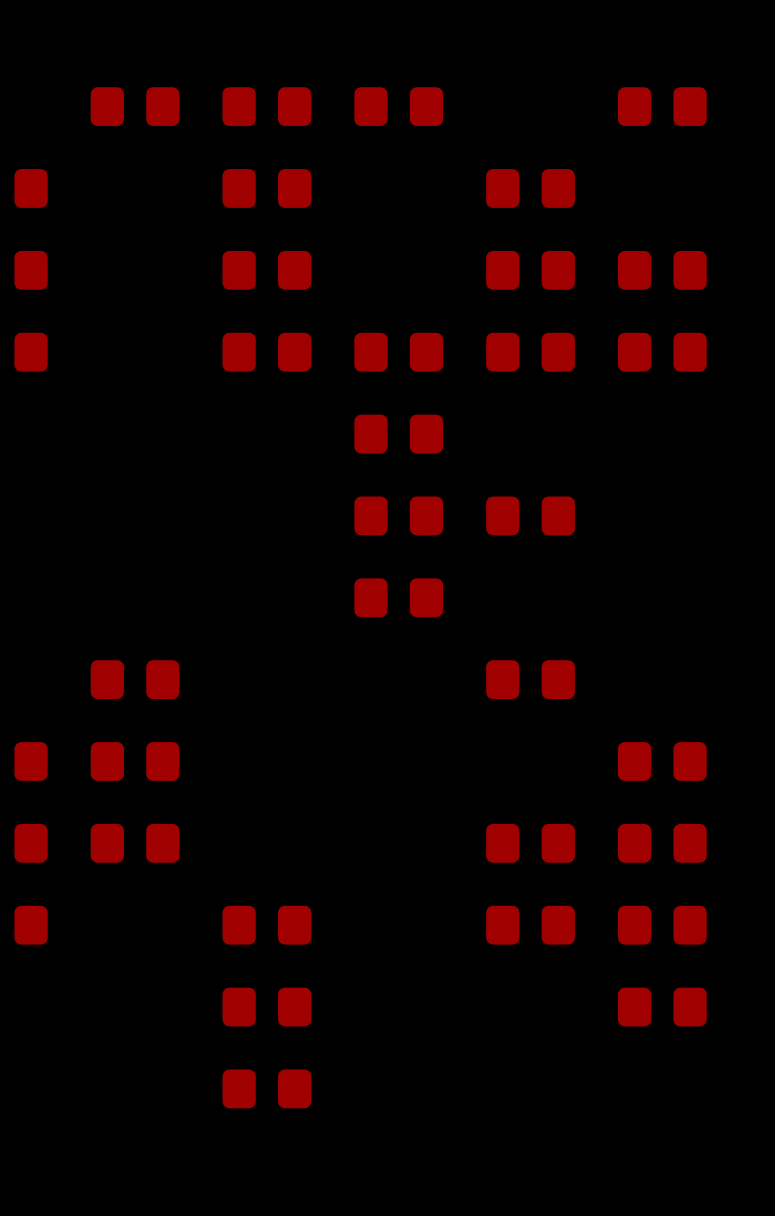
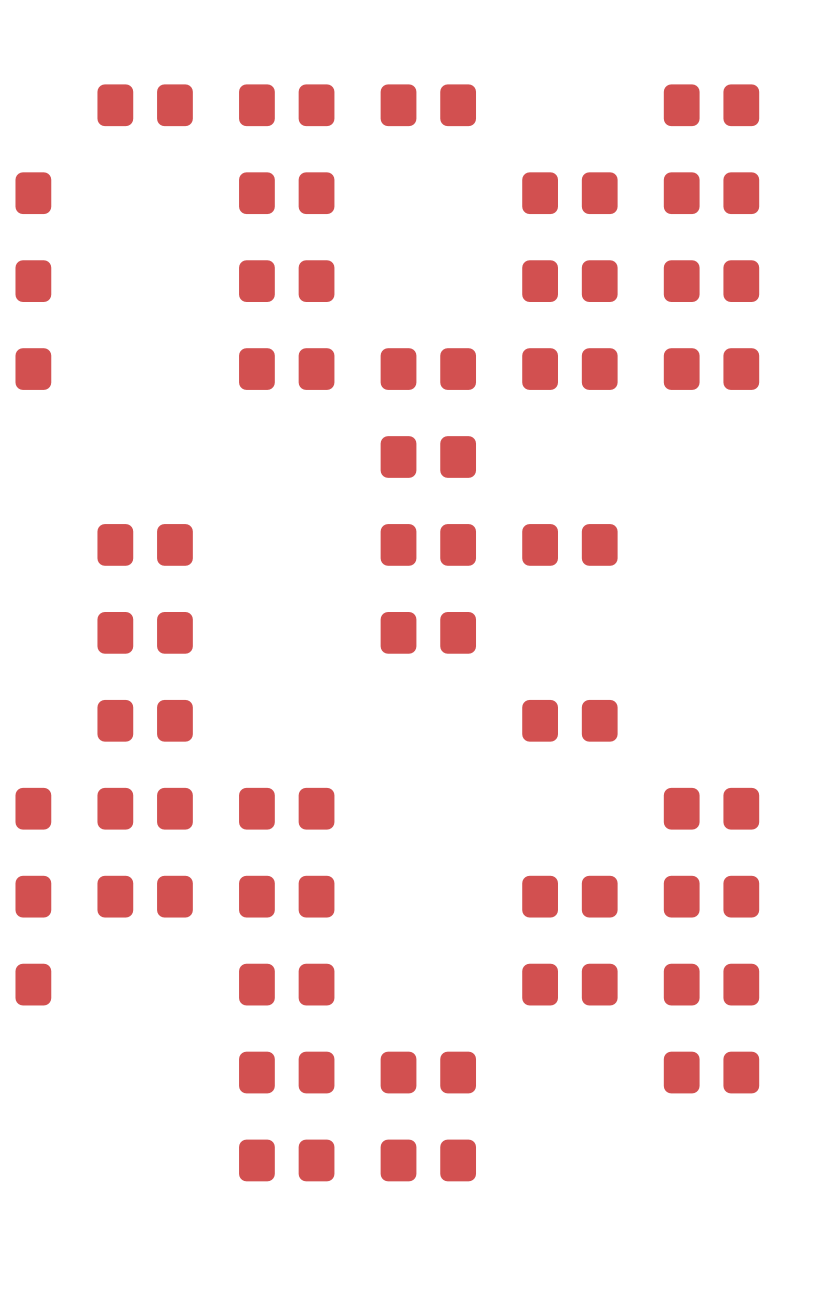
part: none -> (711, 193)
part: none -> (145, 544)
part: none -> (145, 632)
part: none -> (286, 808)
part: none -> (286, 896)
part: none -> (428, 1072)
part: none -> (428, 1160)

